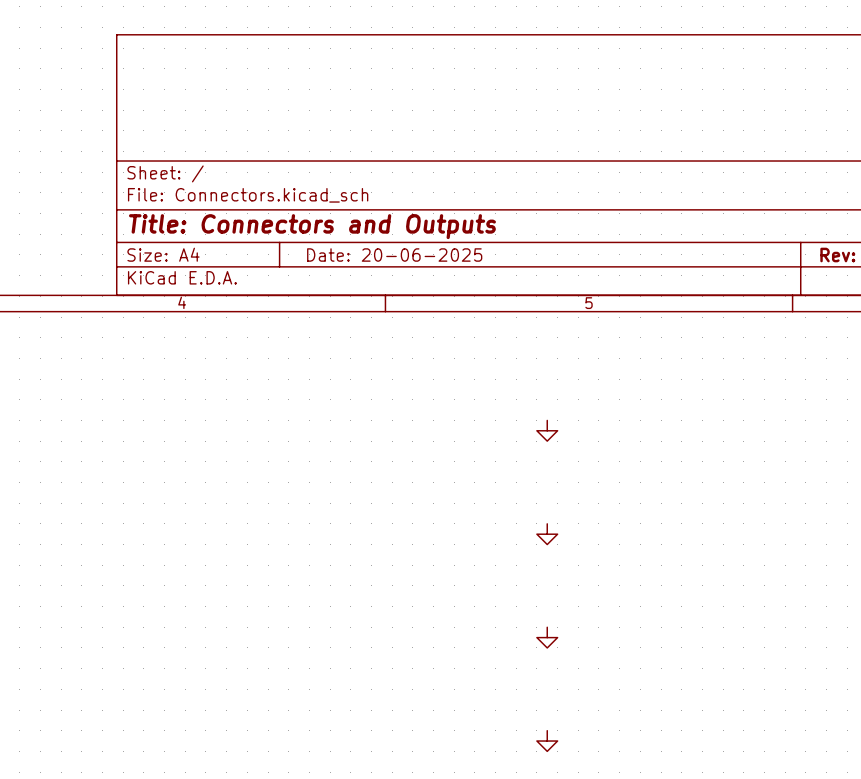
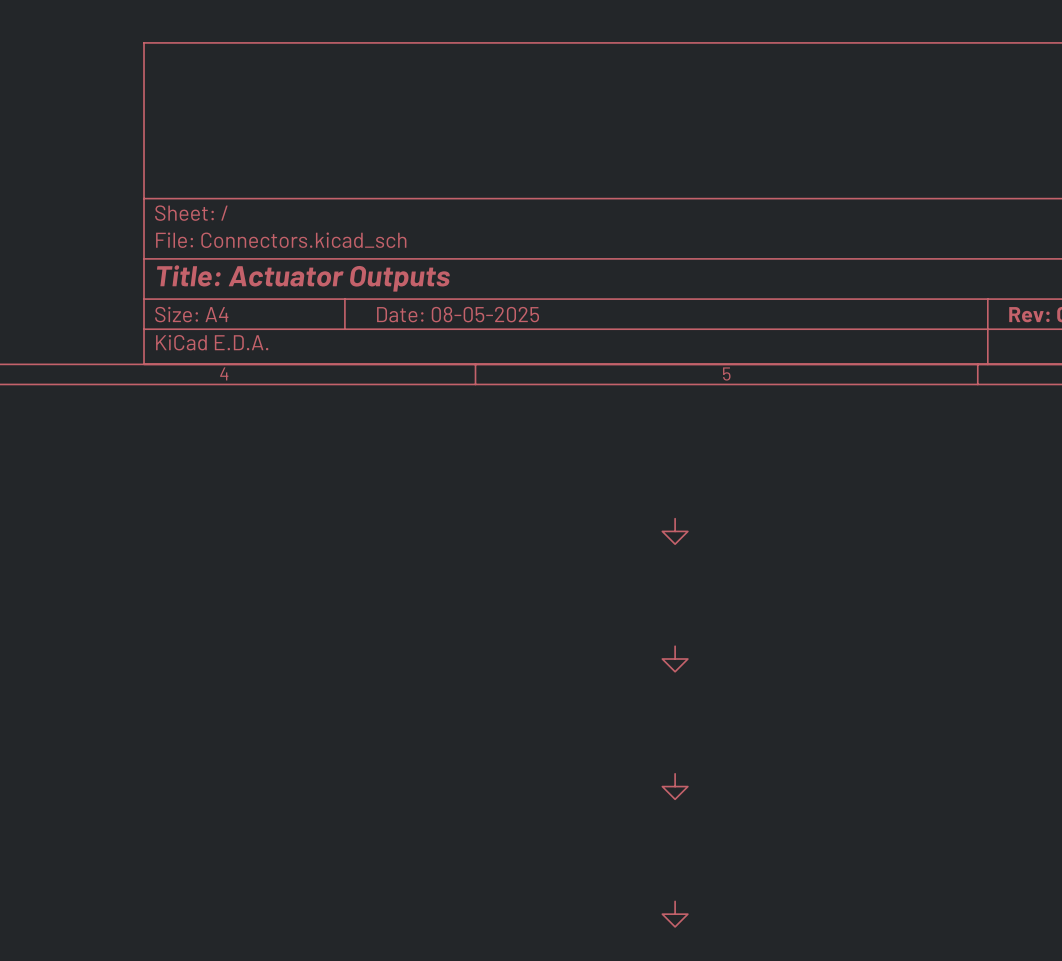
title block: Title: Connectors and Outputs (312, 226) -> Title: Actuator Outputs (303, 278)
title block: Date: 20-06-2025 (394, 255) -> Date: 08-05-2025 (458, 314)

